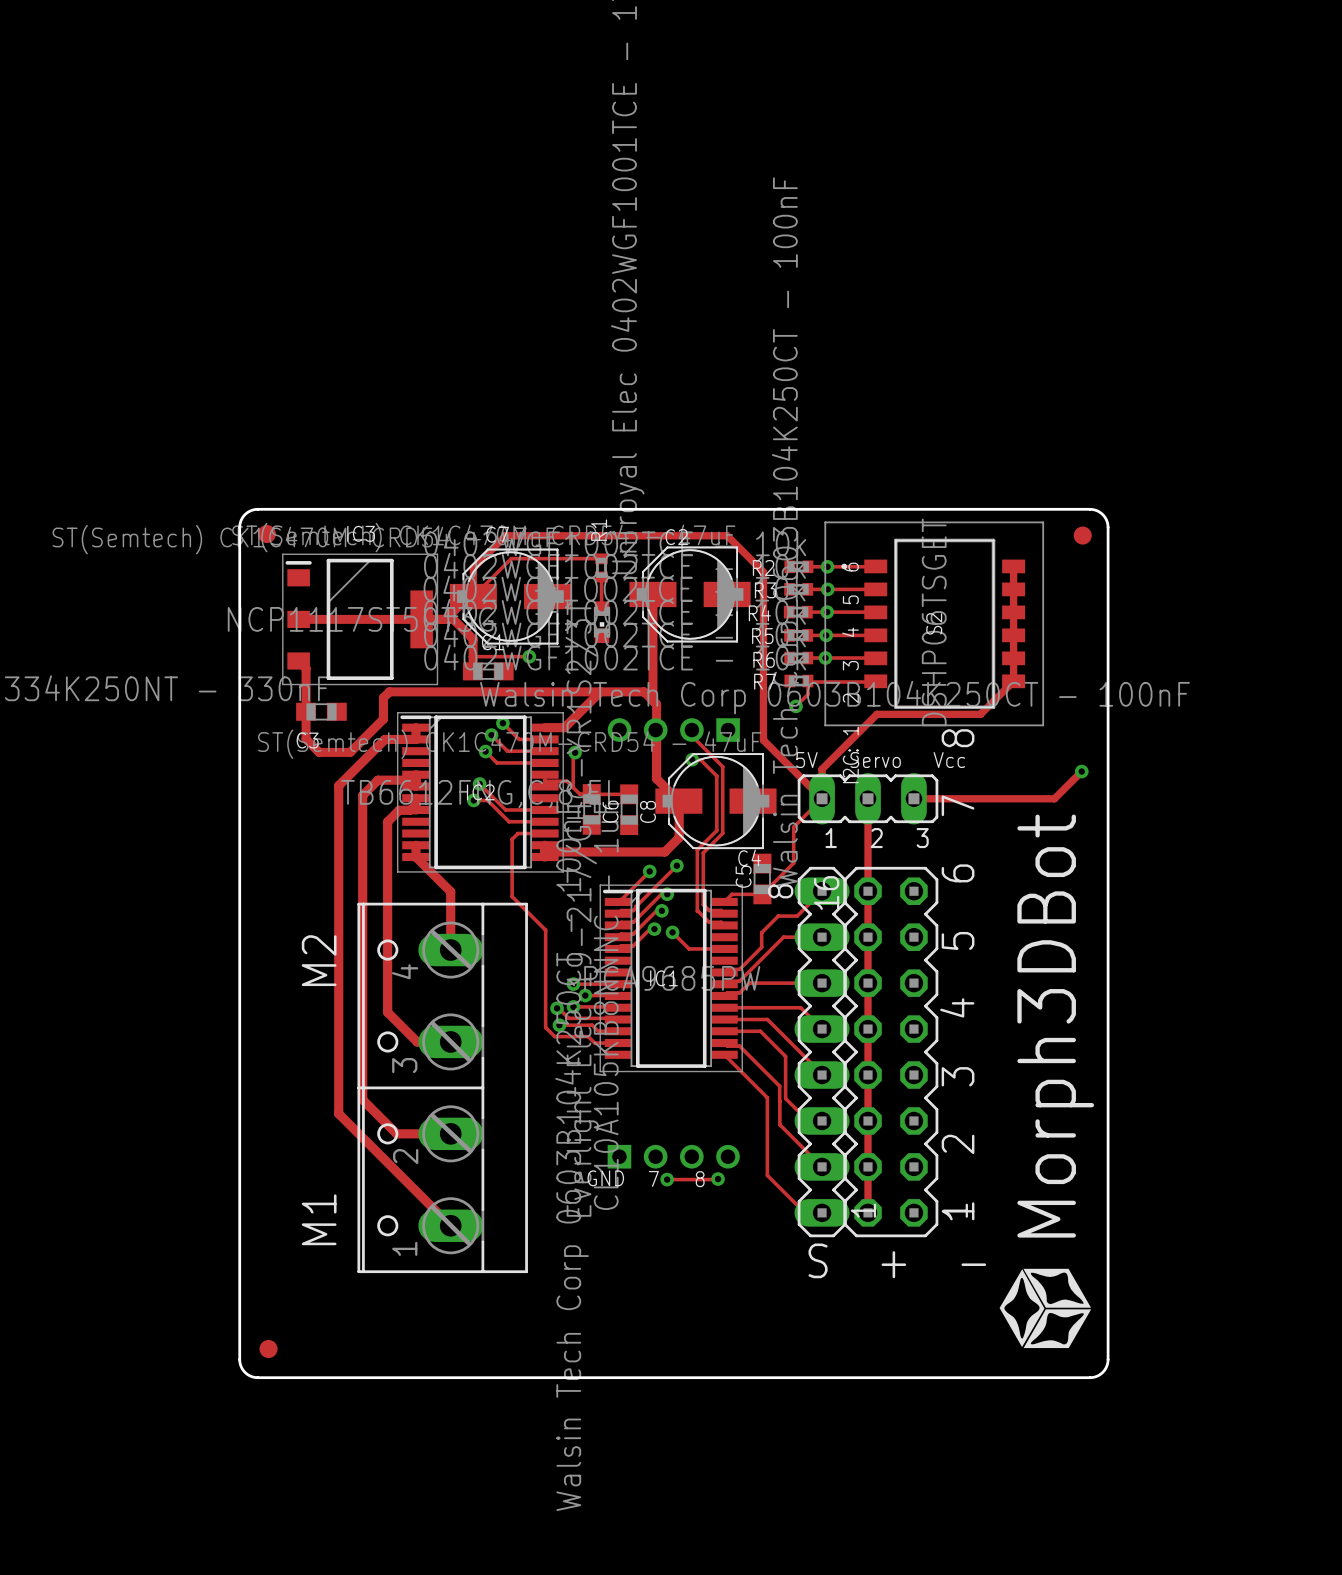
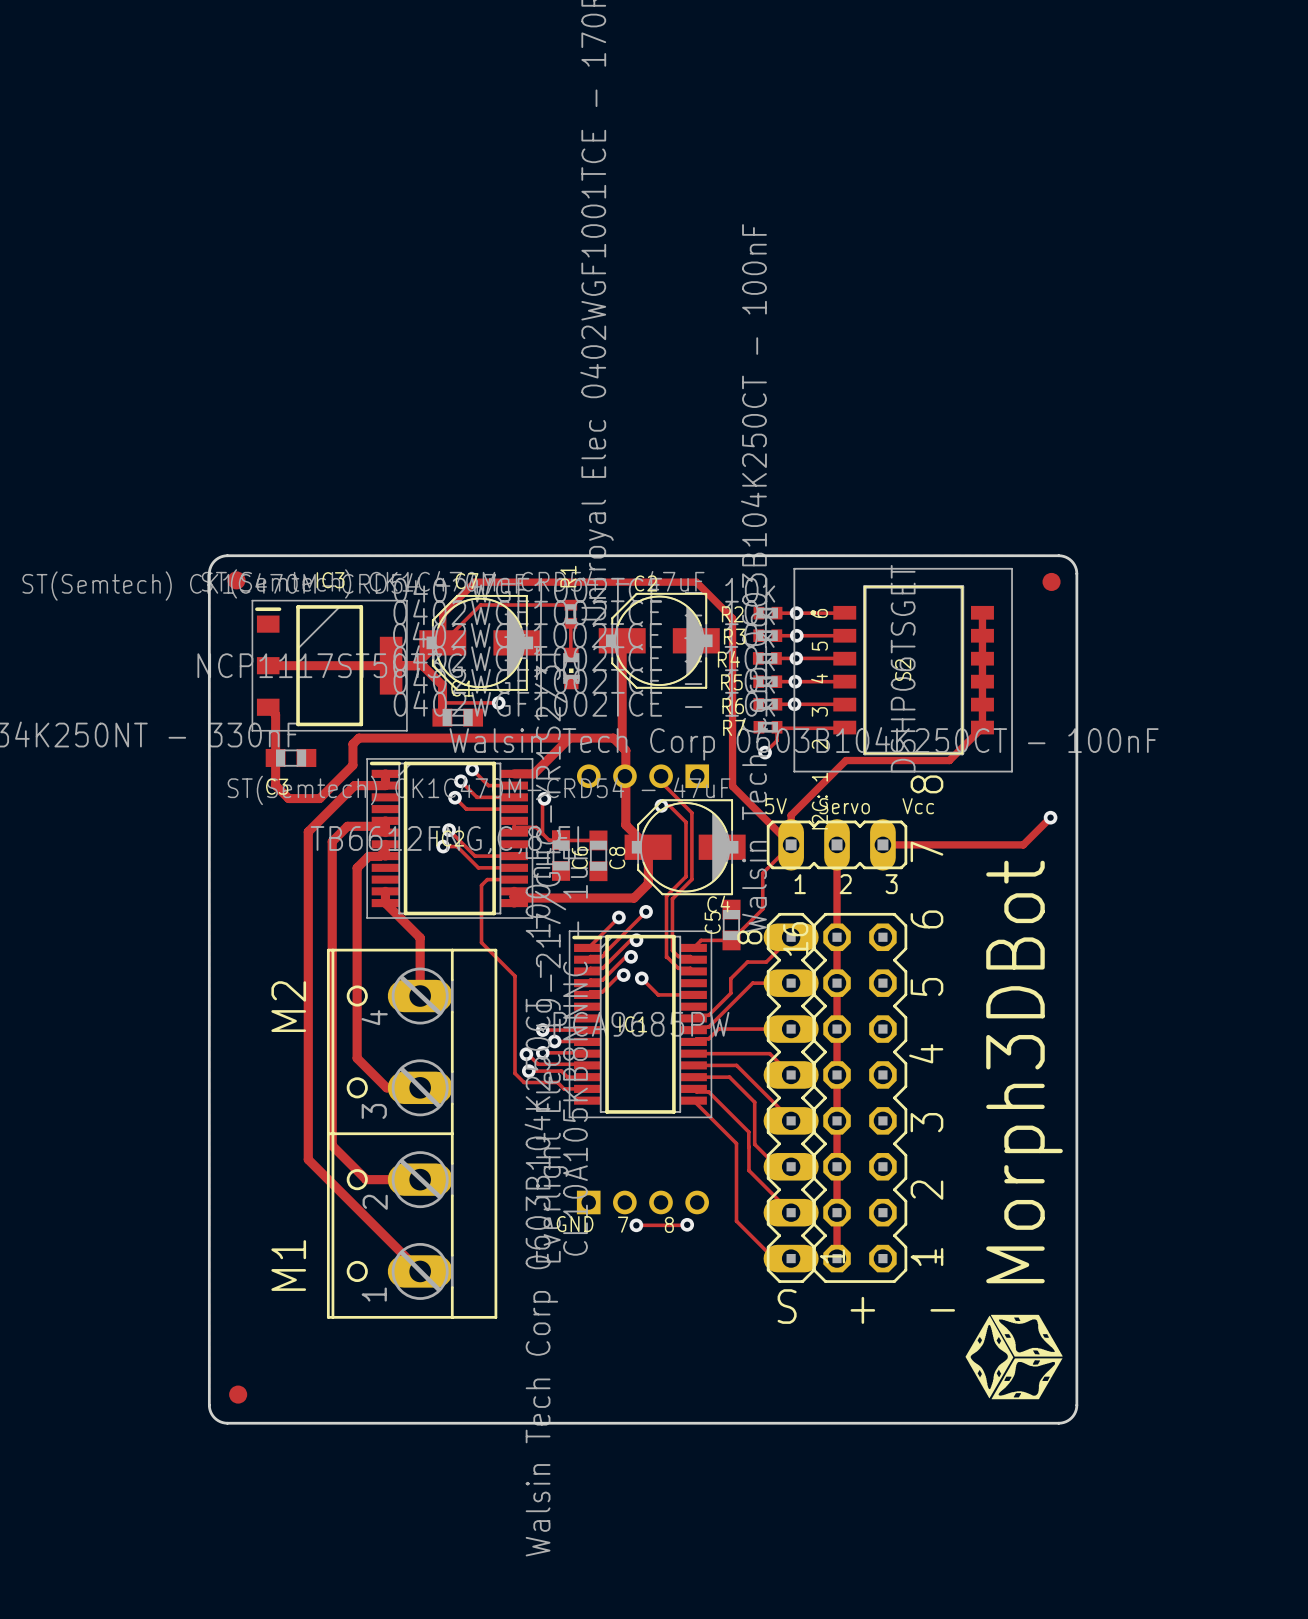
drawing shape: [999, 814, 1095, 1349] -> [965, 860, 1063, 1400]

